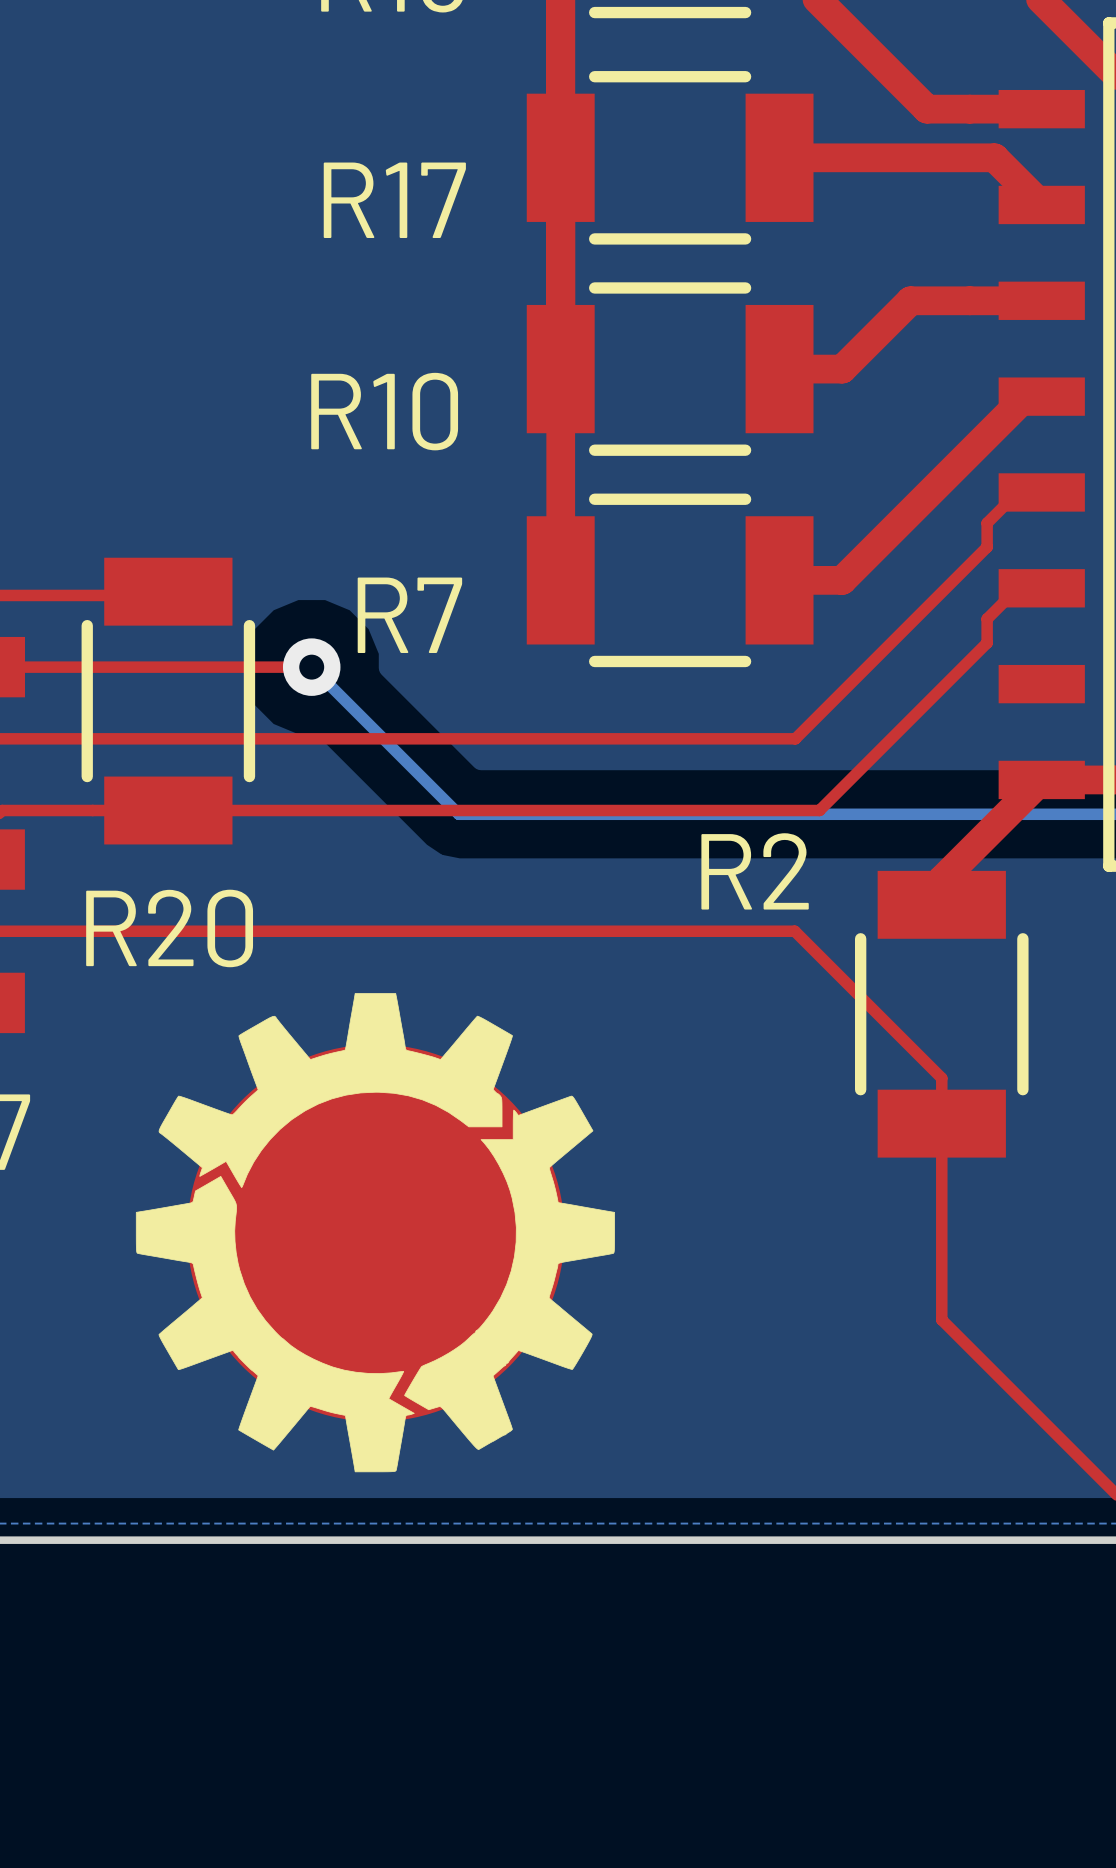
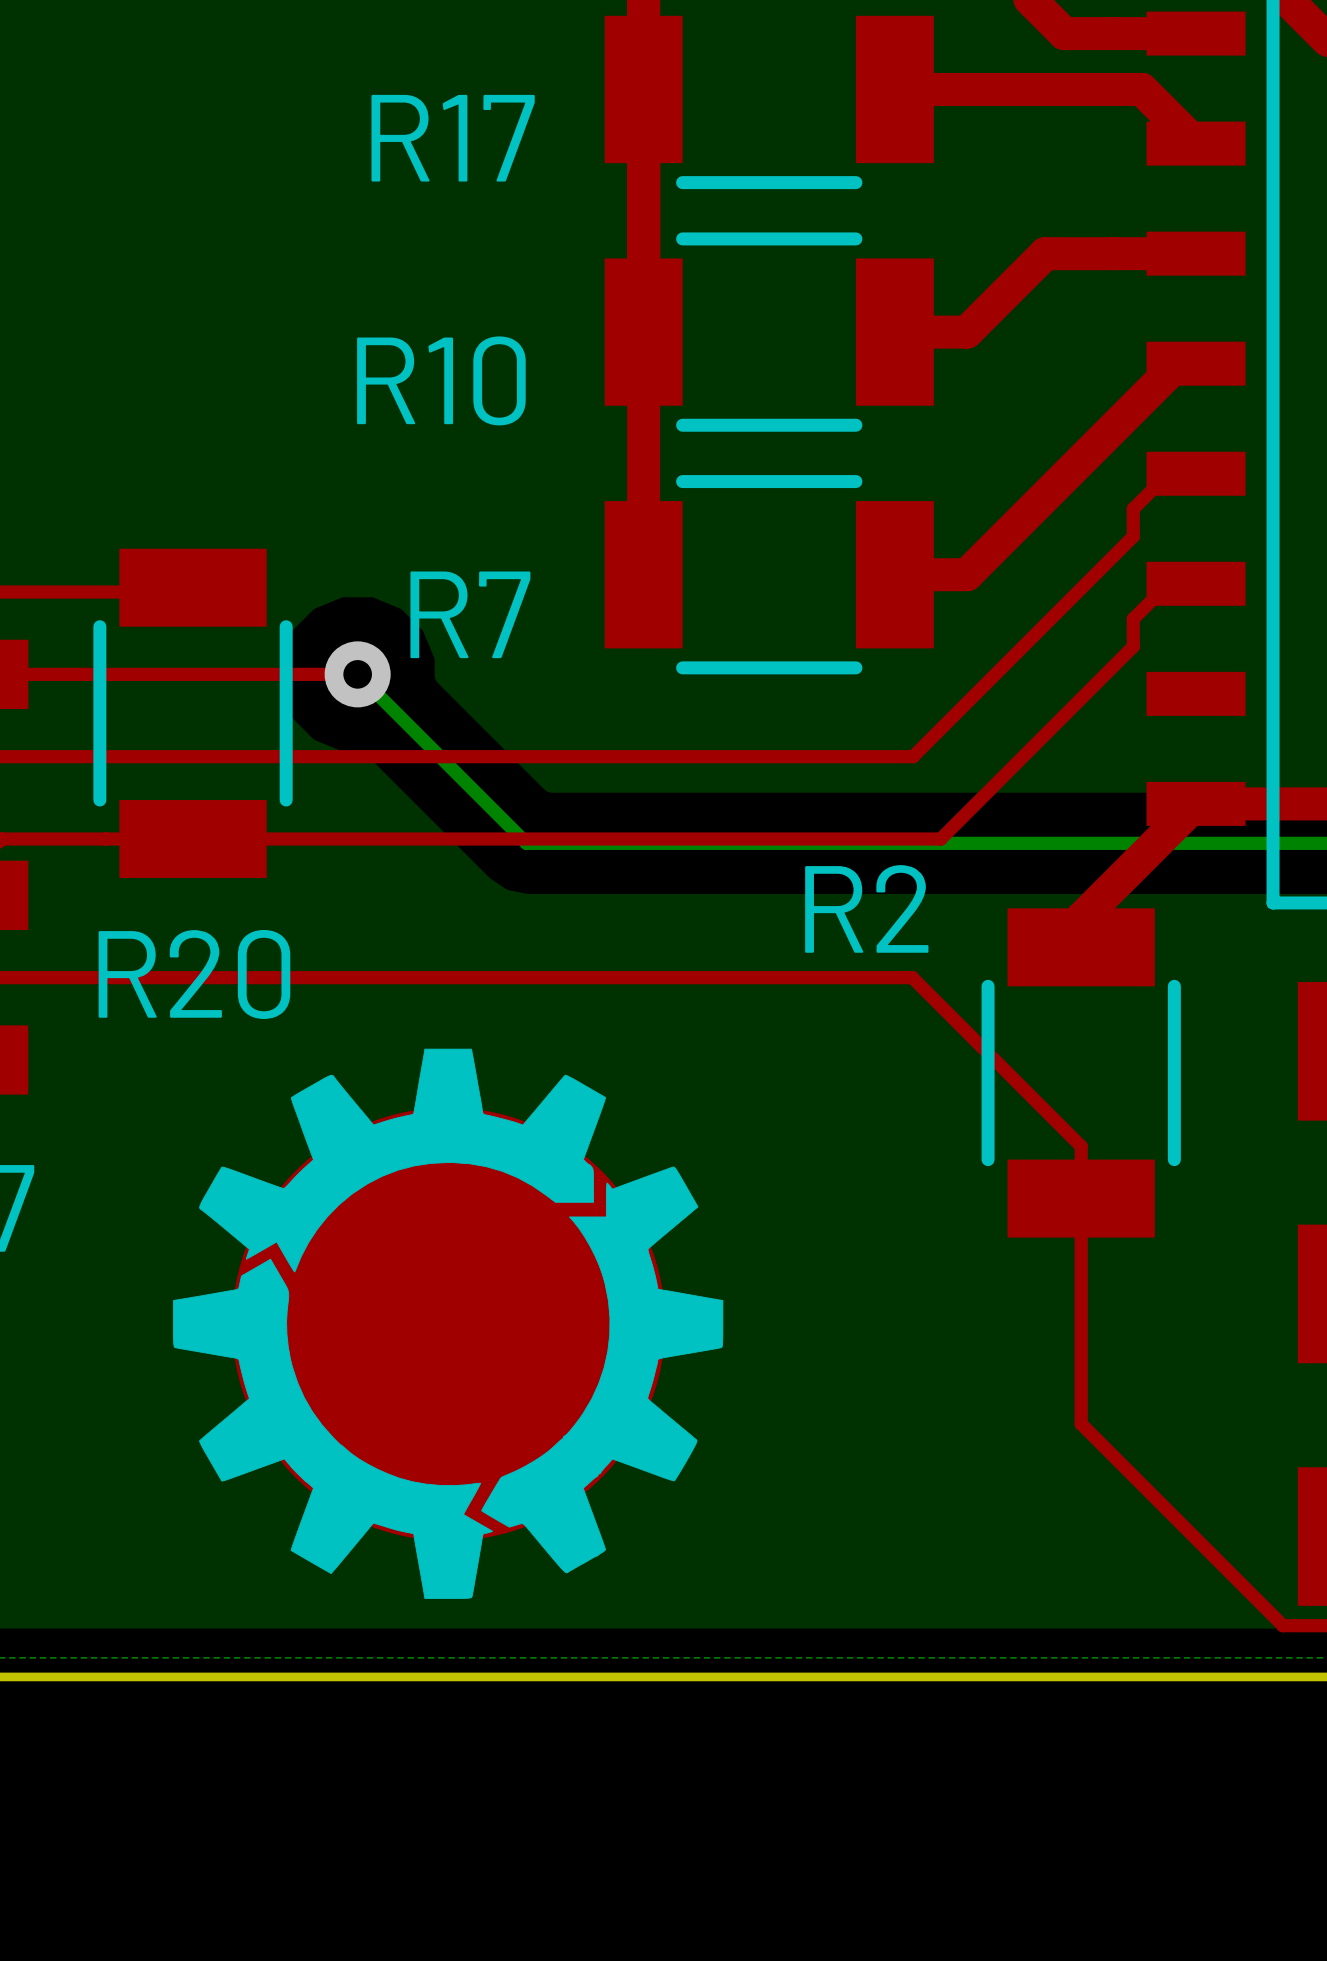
part position: (375, 1232) -> (448, 1323)

